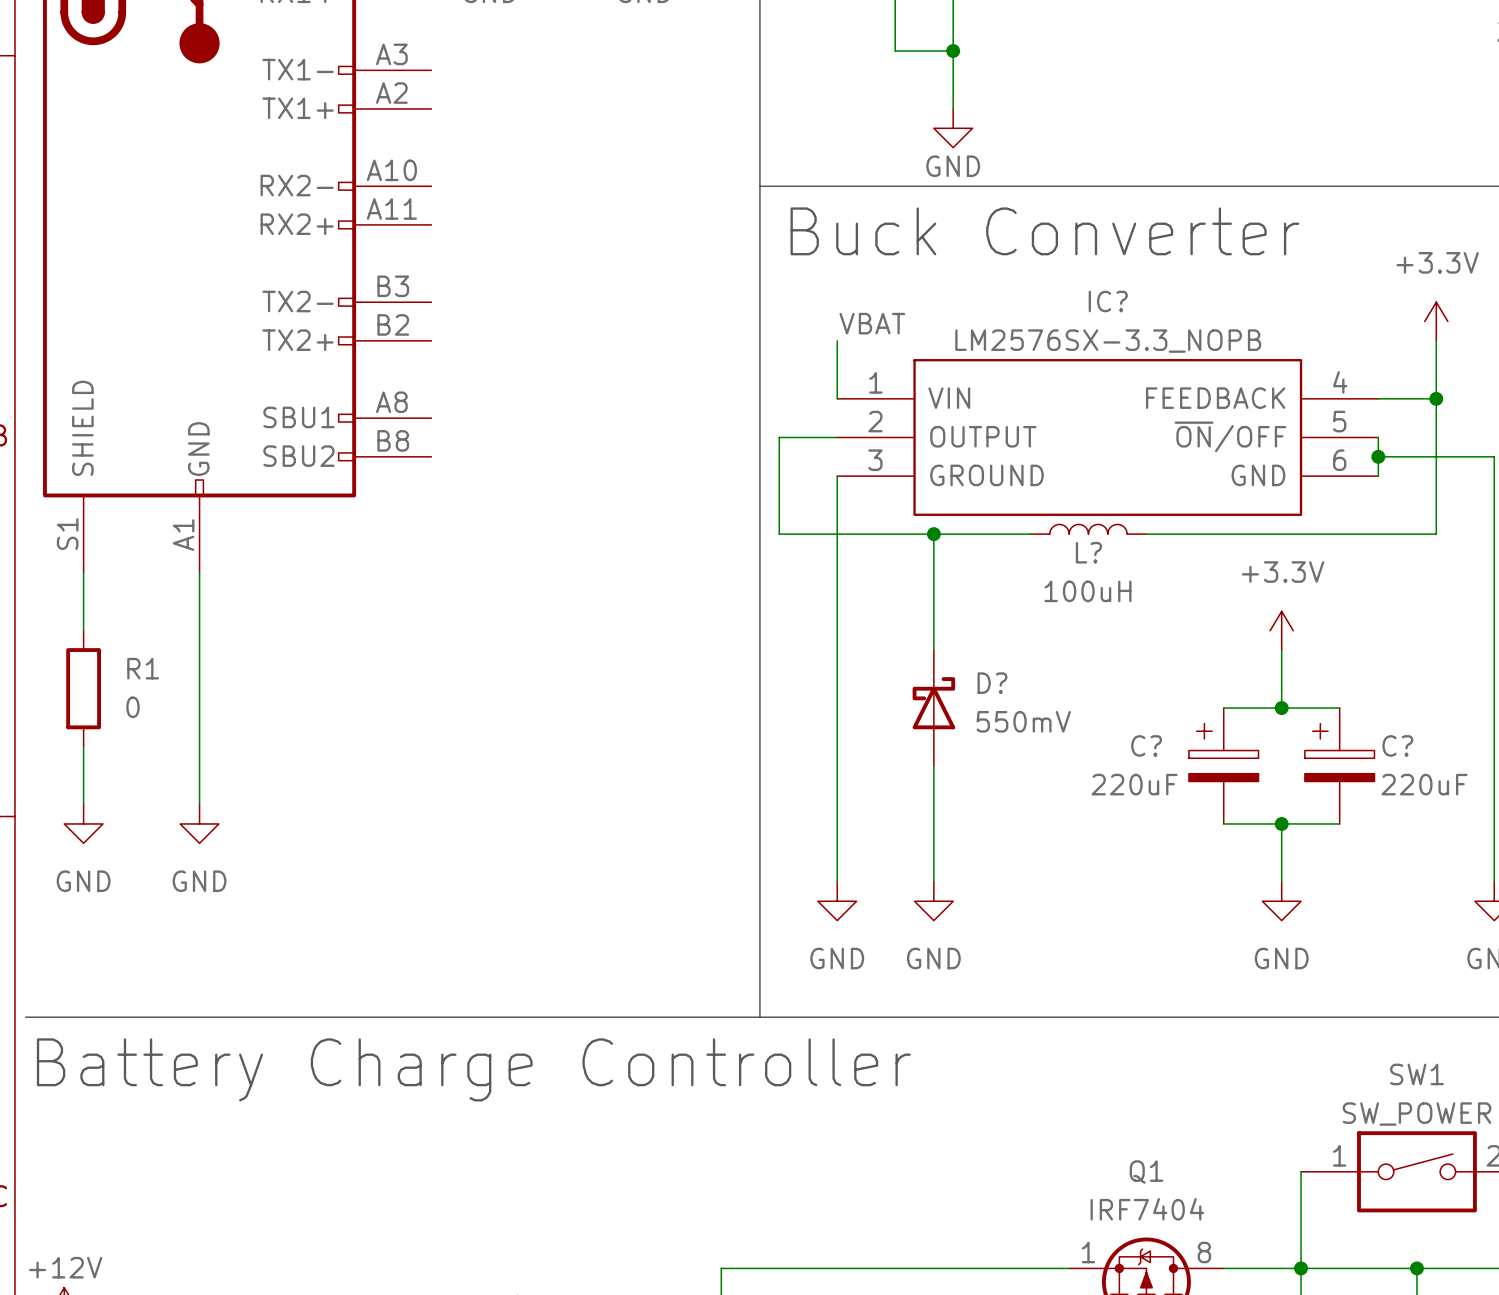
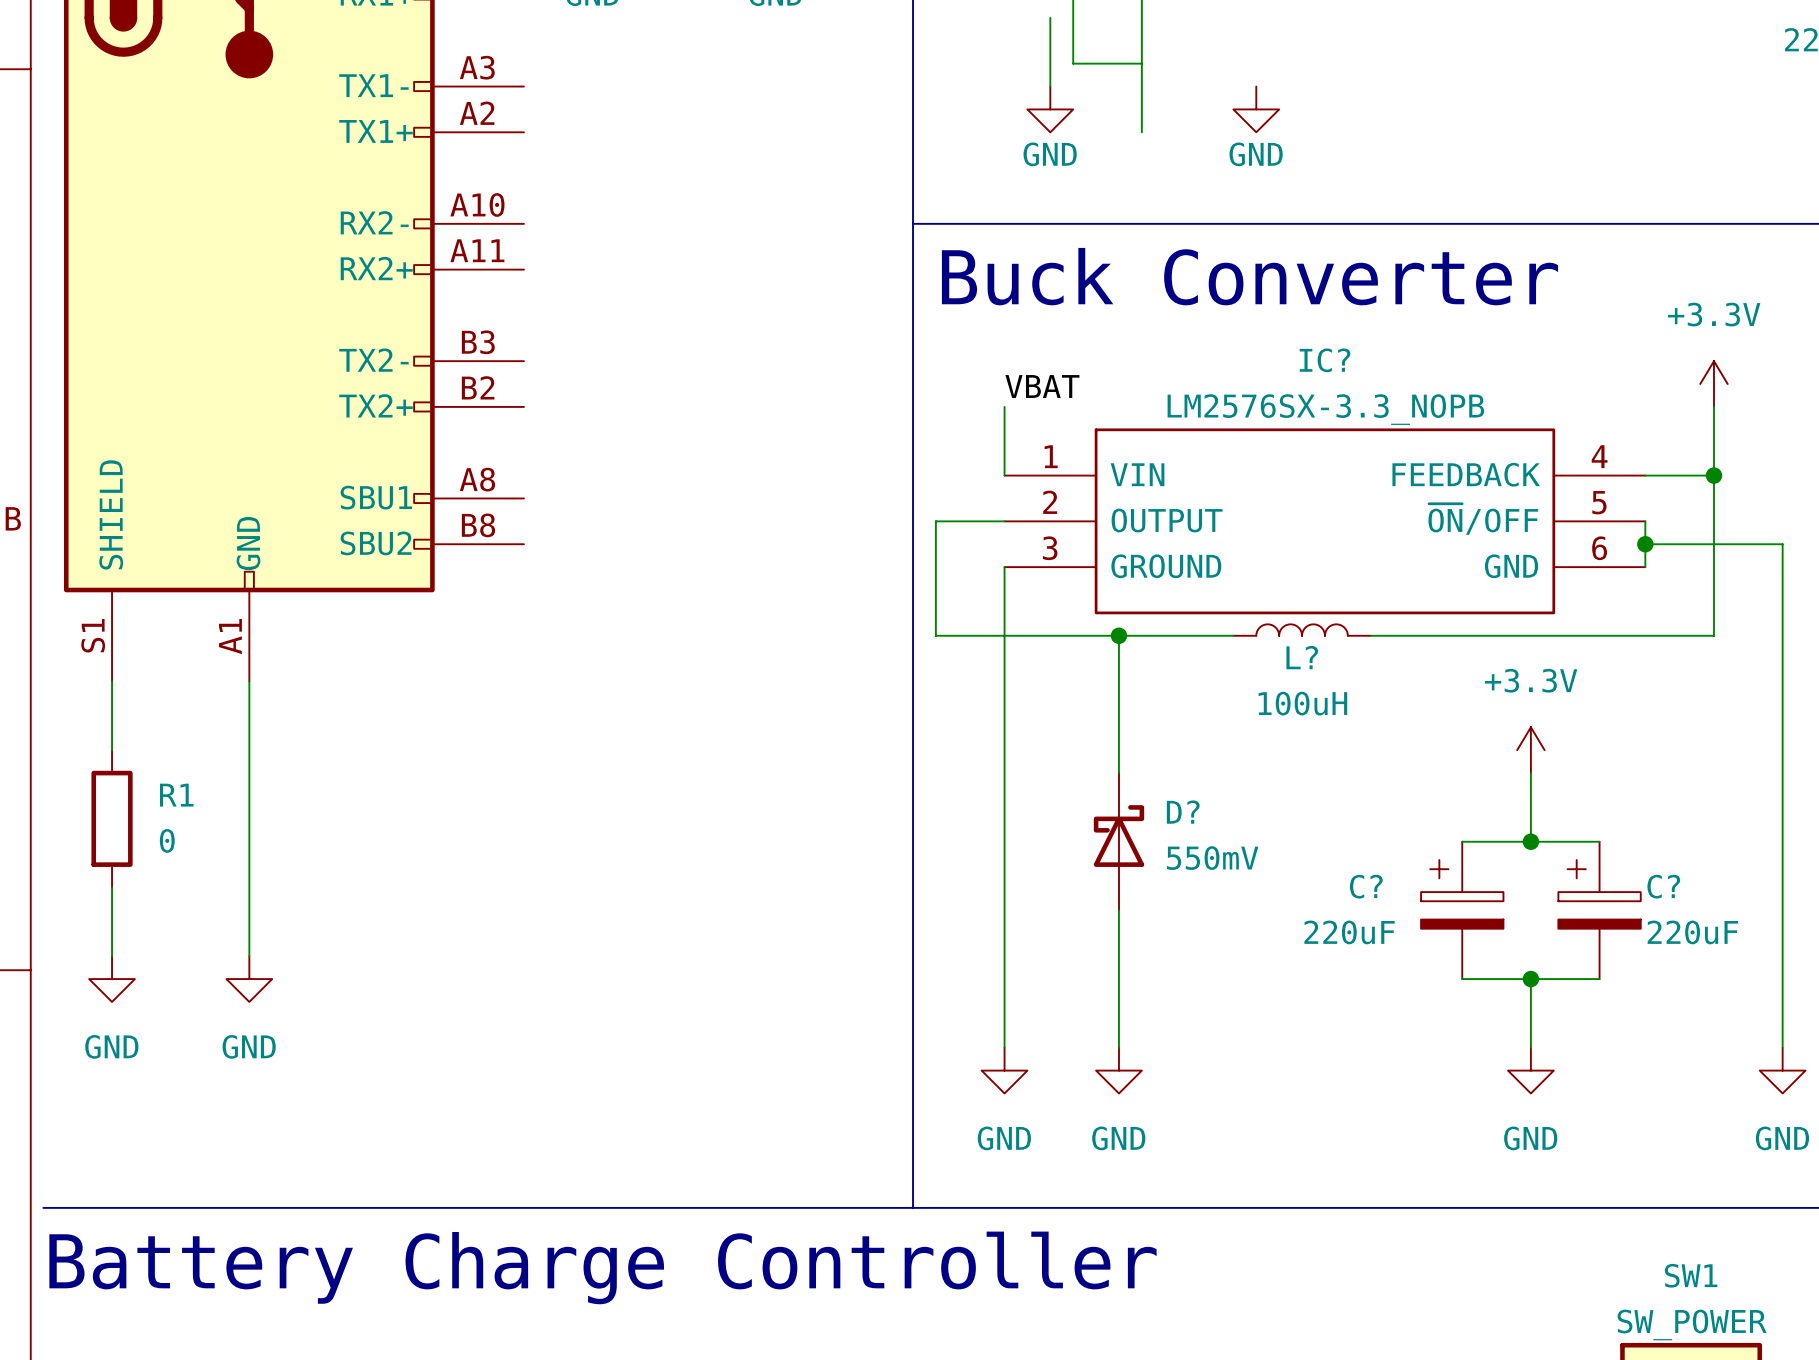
wire: none -> (1050, 17) (1050, 86)
junction: (953, 51) -> none
power symbol: none -> GND (1050, 109)
power symbol: none -> GND (1256, 109)
power symbol: GND (953, 128) -> none

